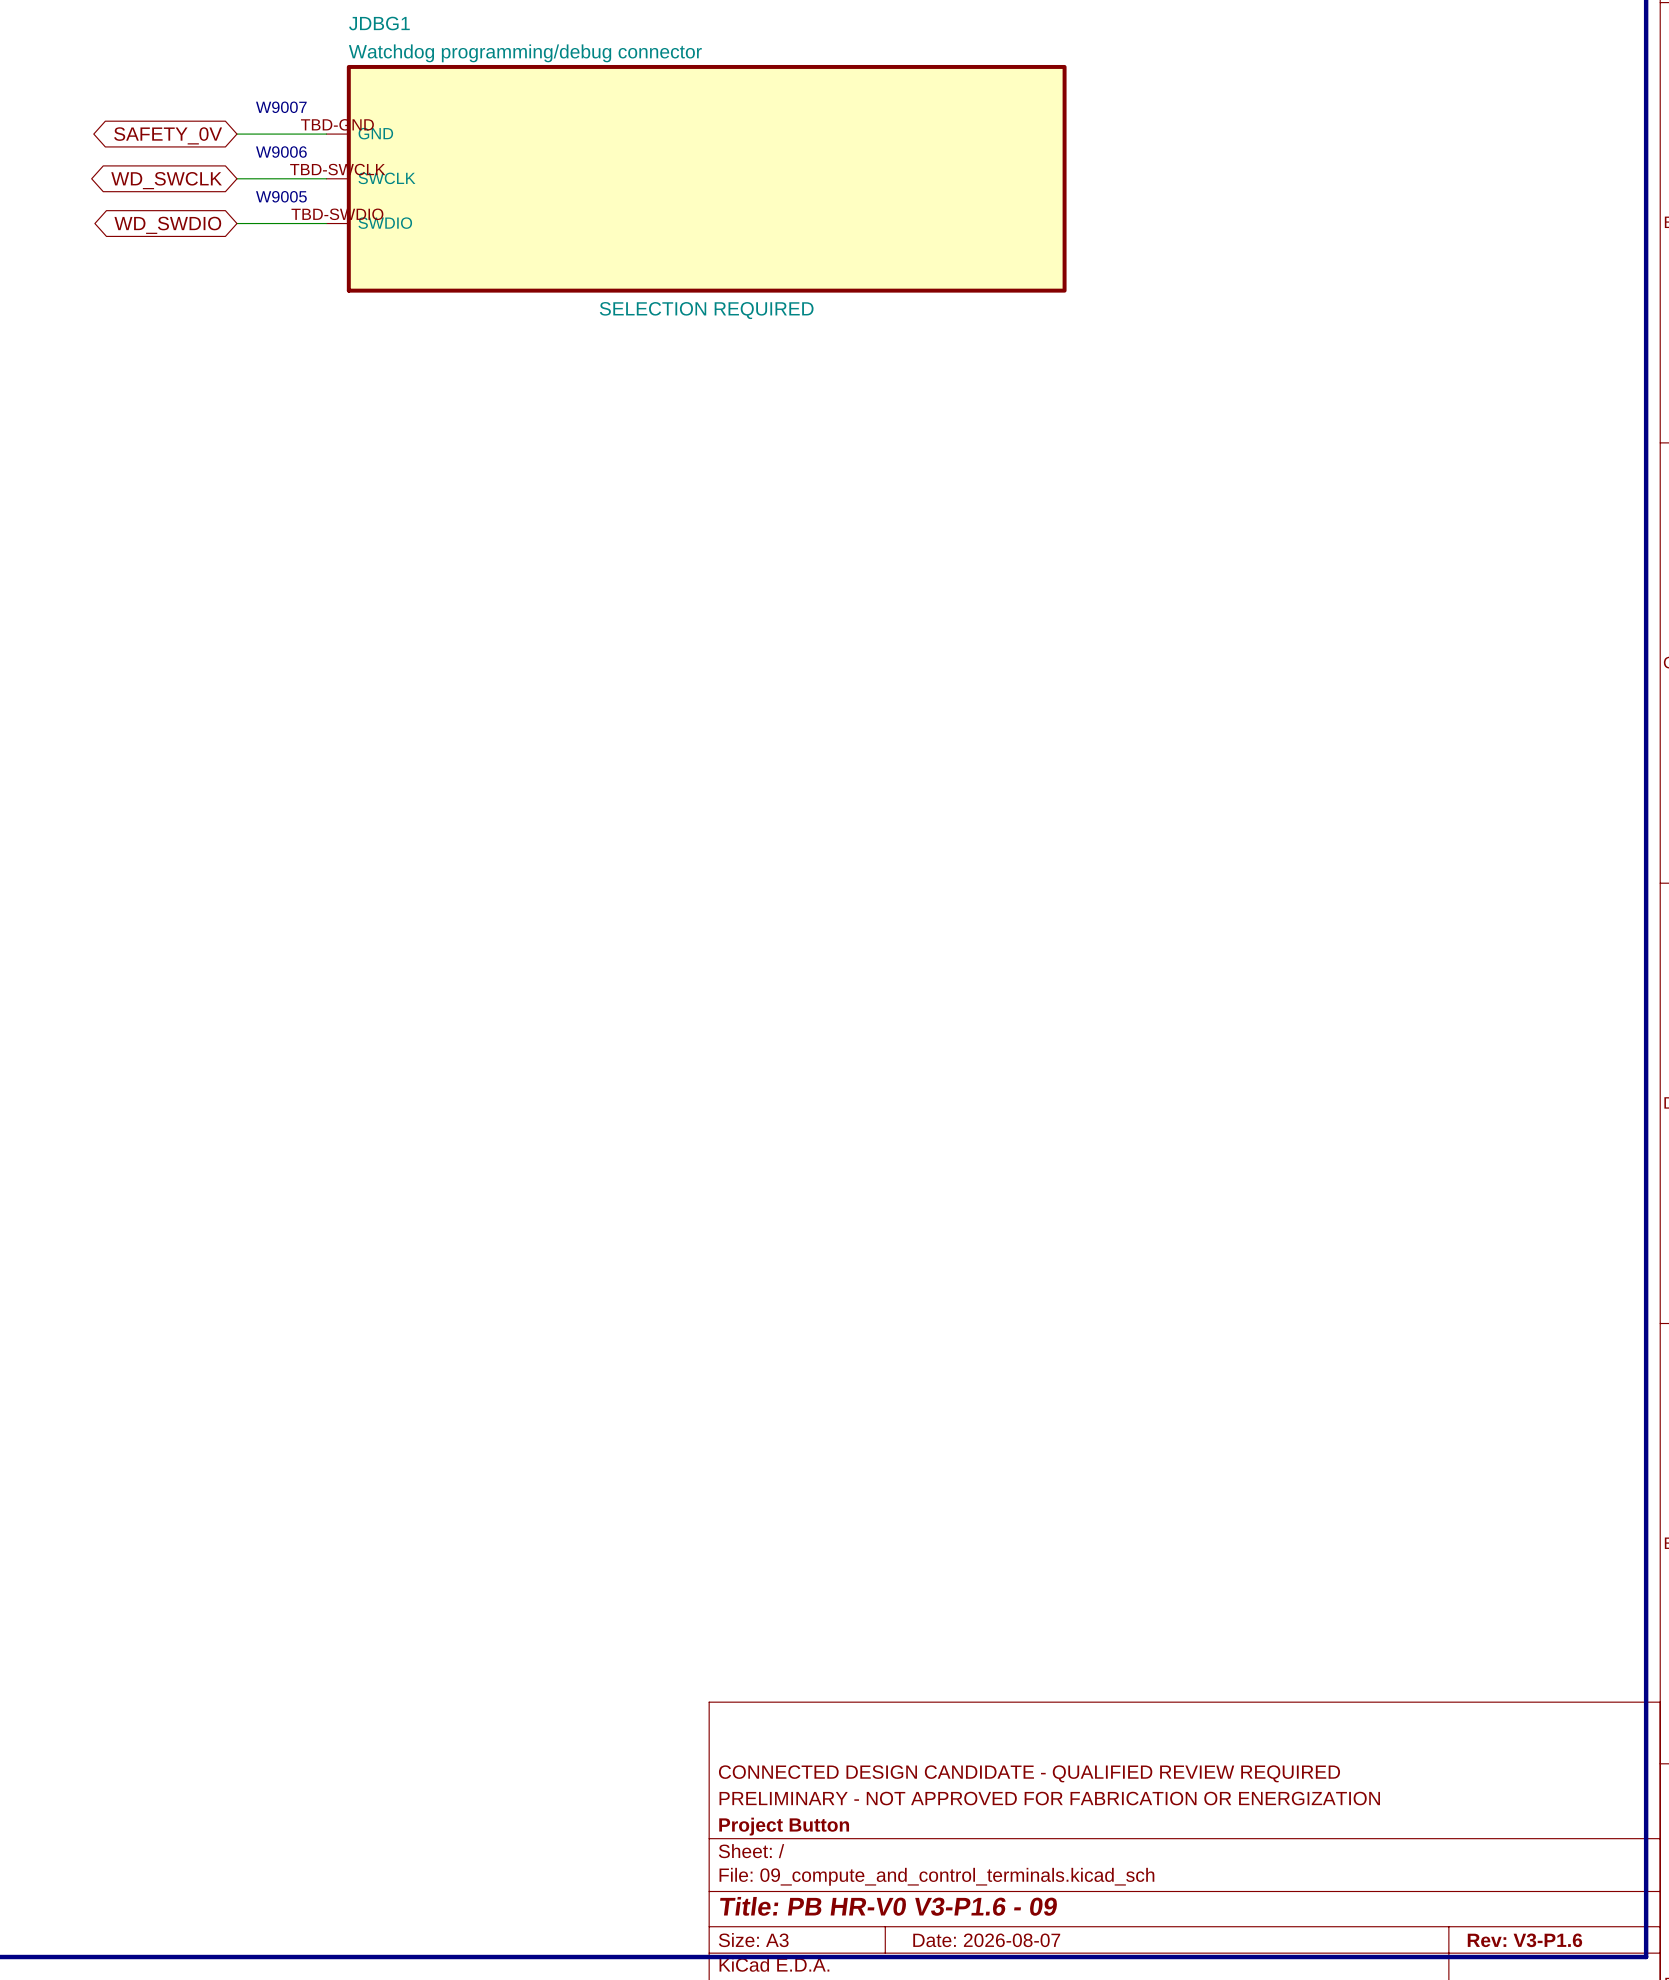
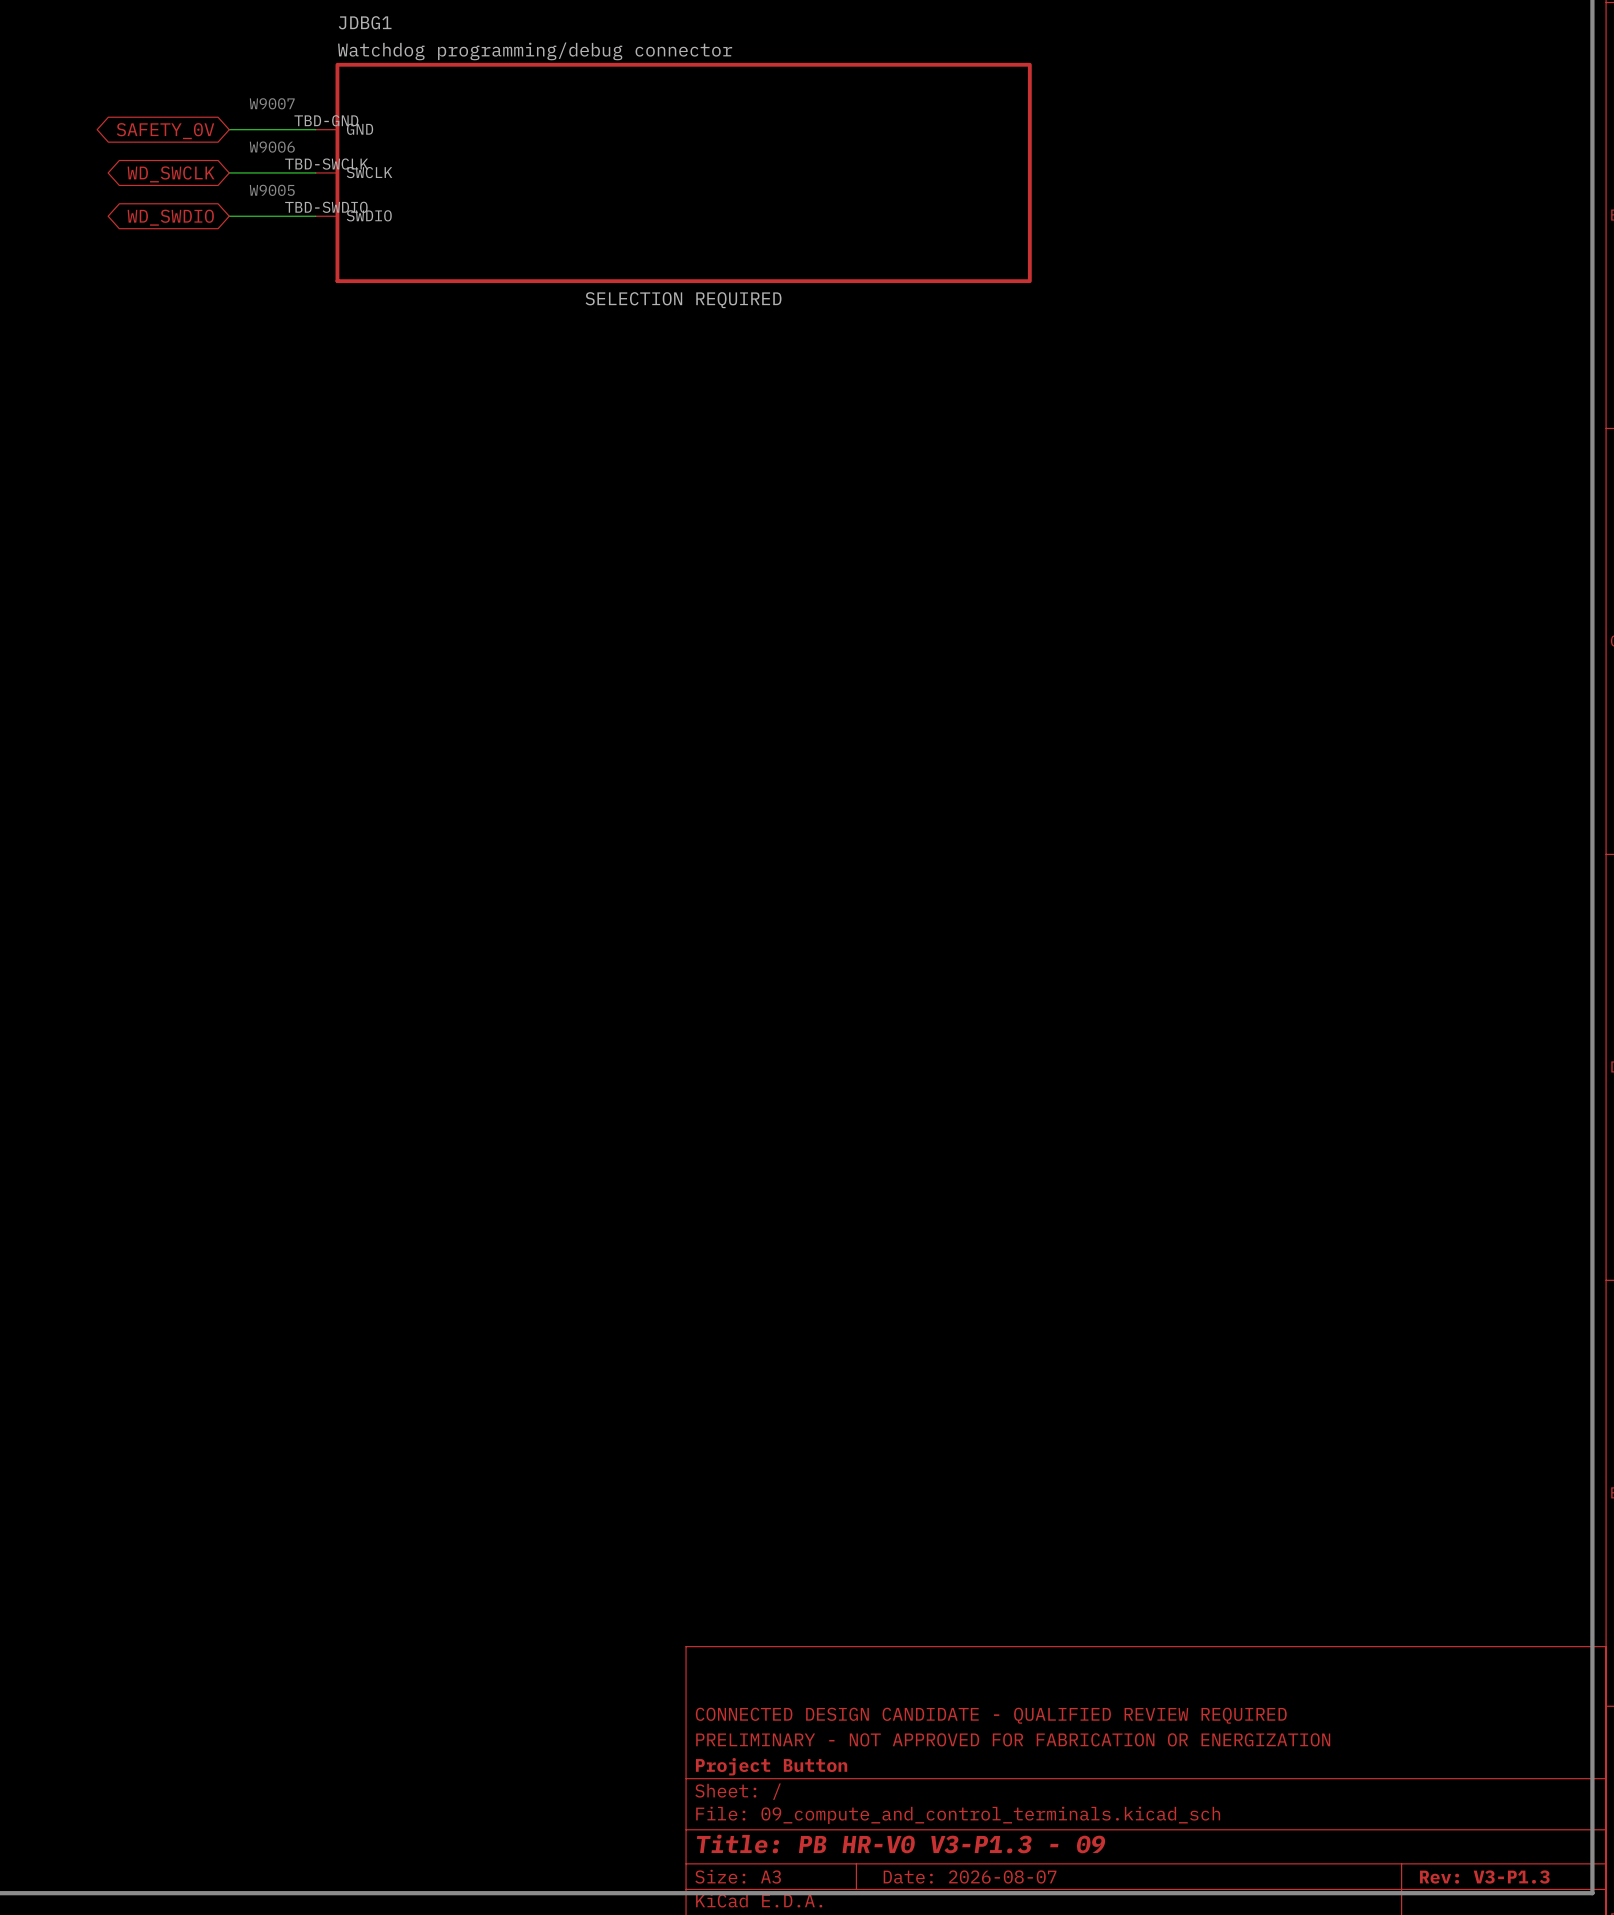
title block: Title: PB HR-V0 V3-P1.6 - 09 (888, 1906) -> Title: PB HR-V0 V3-P1.3 - 09 (901, 1843)
title block: Rev: V3-P1.6 (1524, 1940) -> Rev: V3-P1.3 (1484, 1877)

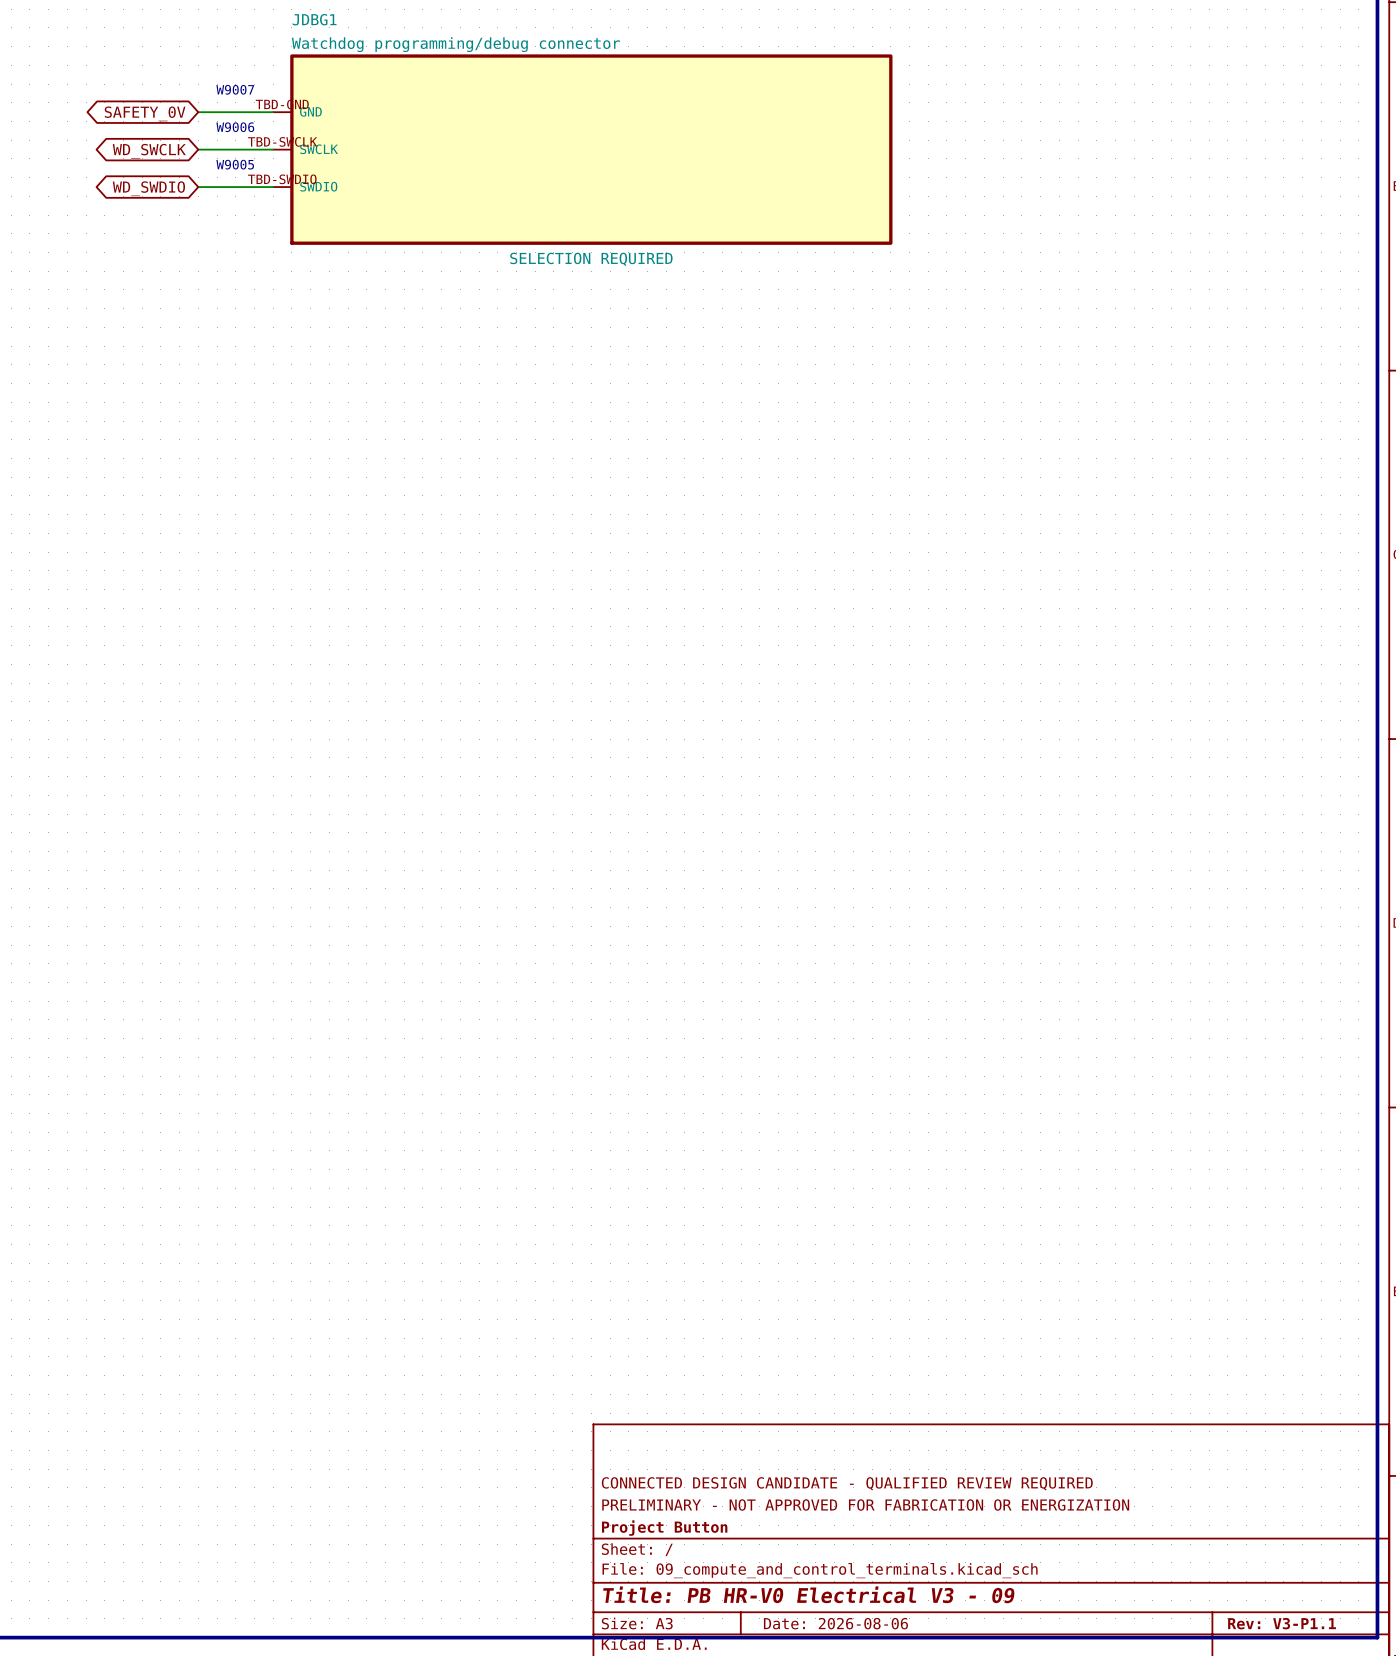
title block: Title: PB HR-V0 V3-P1.3 - 09 (901, 1843) -> Title: PB HR-V0 Electrical V3 - 09 (808, 1594)
title block: Date: 2026-08-07 (970, 1877) -> Date: 2026-08-06 (835, 1623)
title block: Rev: V3-P1.3 (1484, 1877) -> Rev: V3-P1.1 (1282, 1623)

